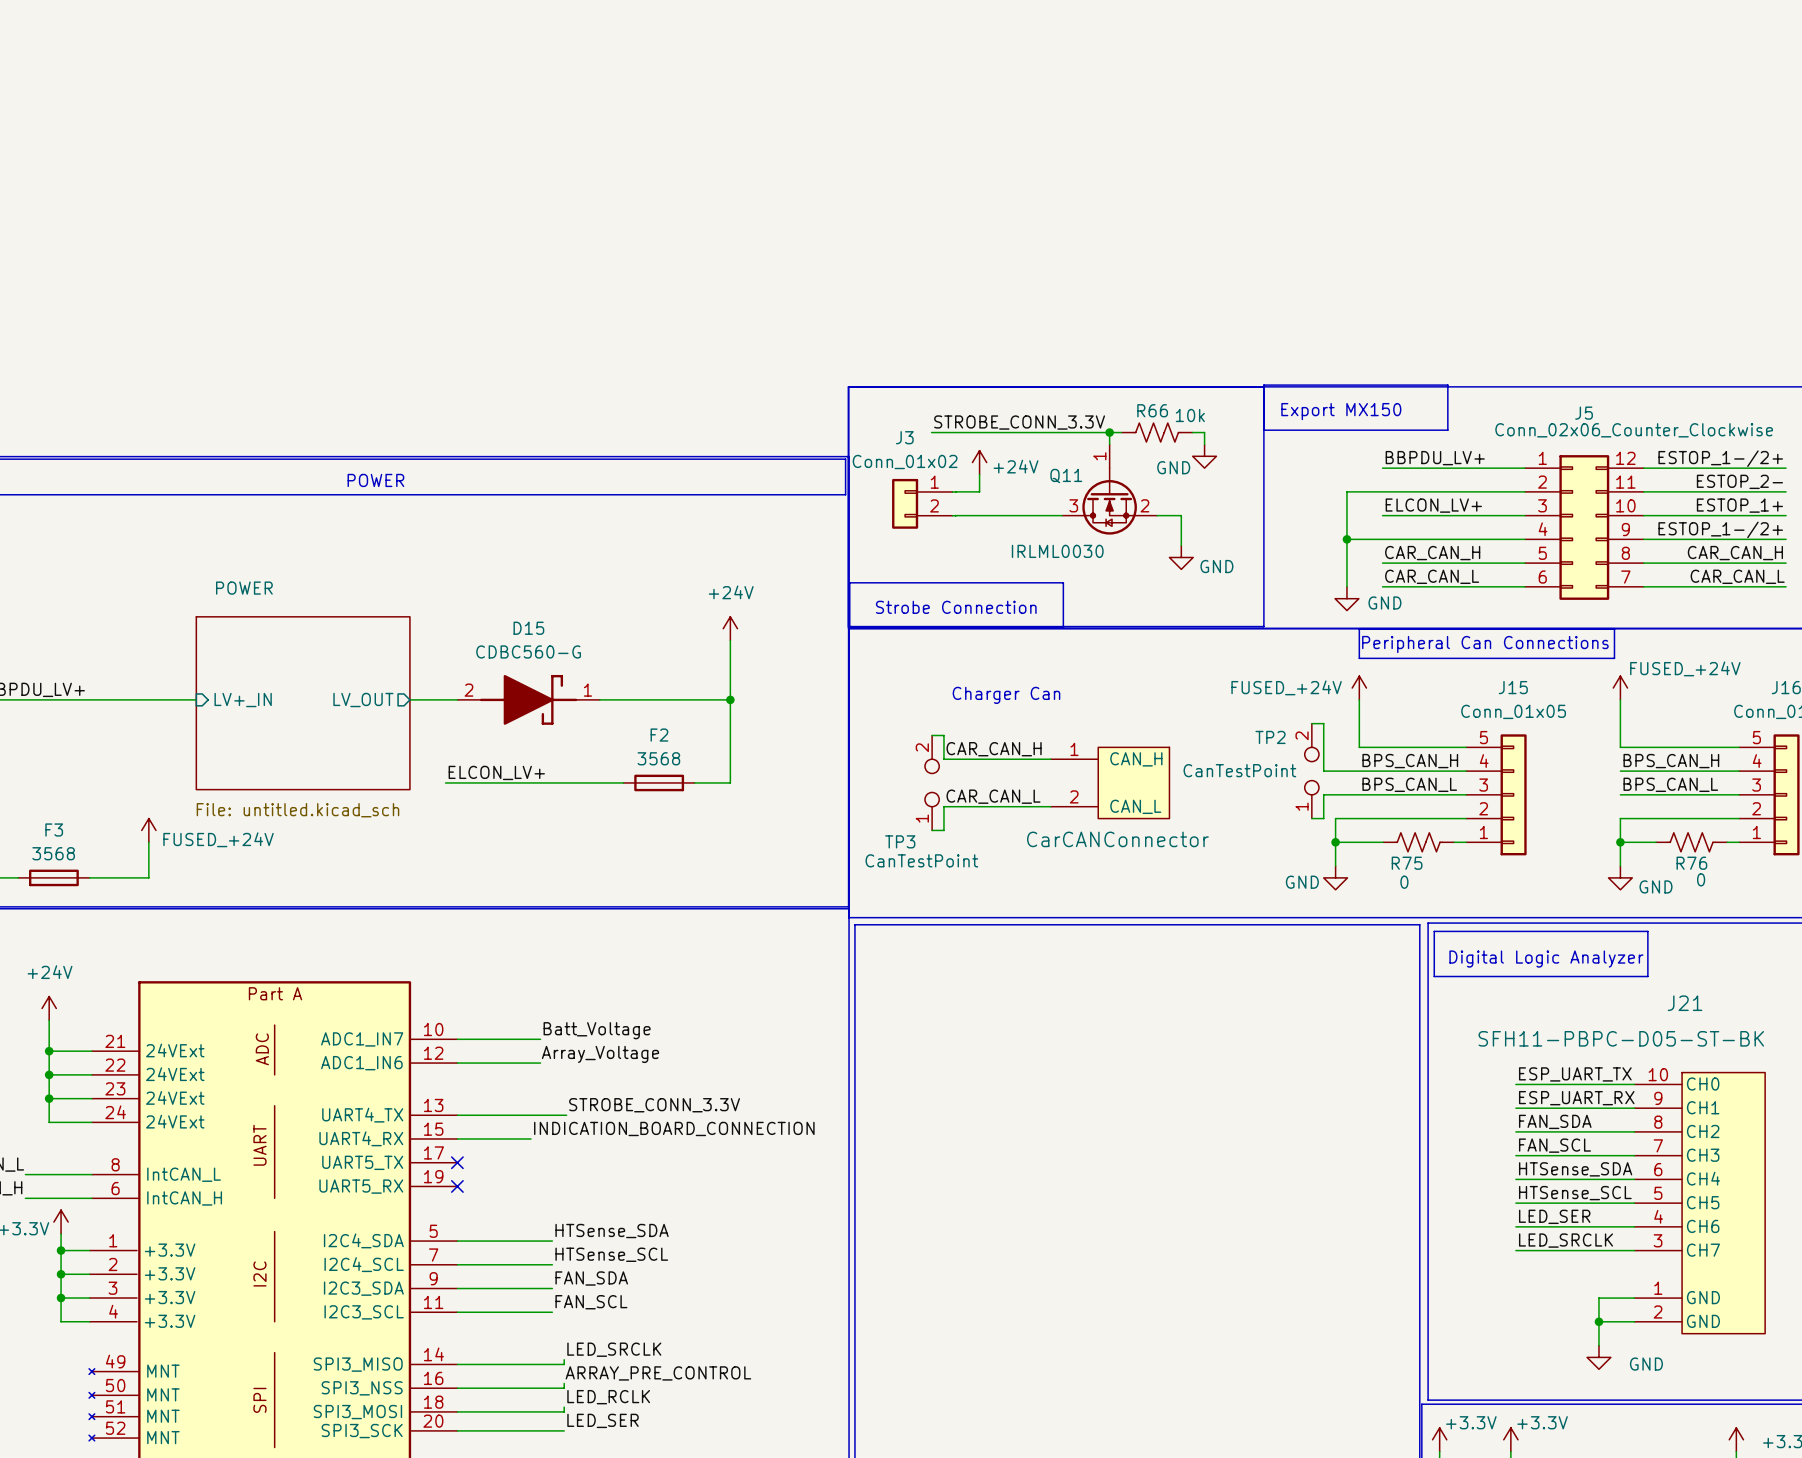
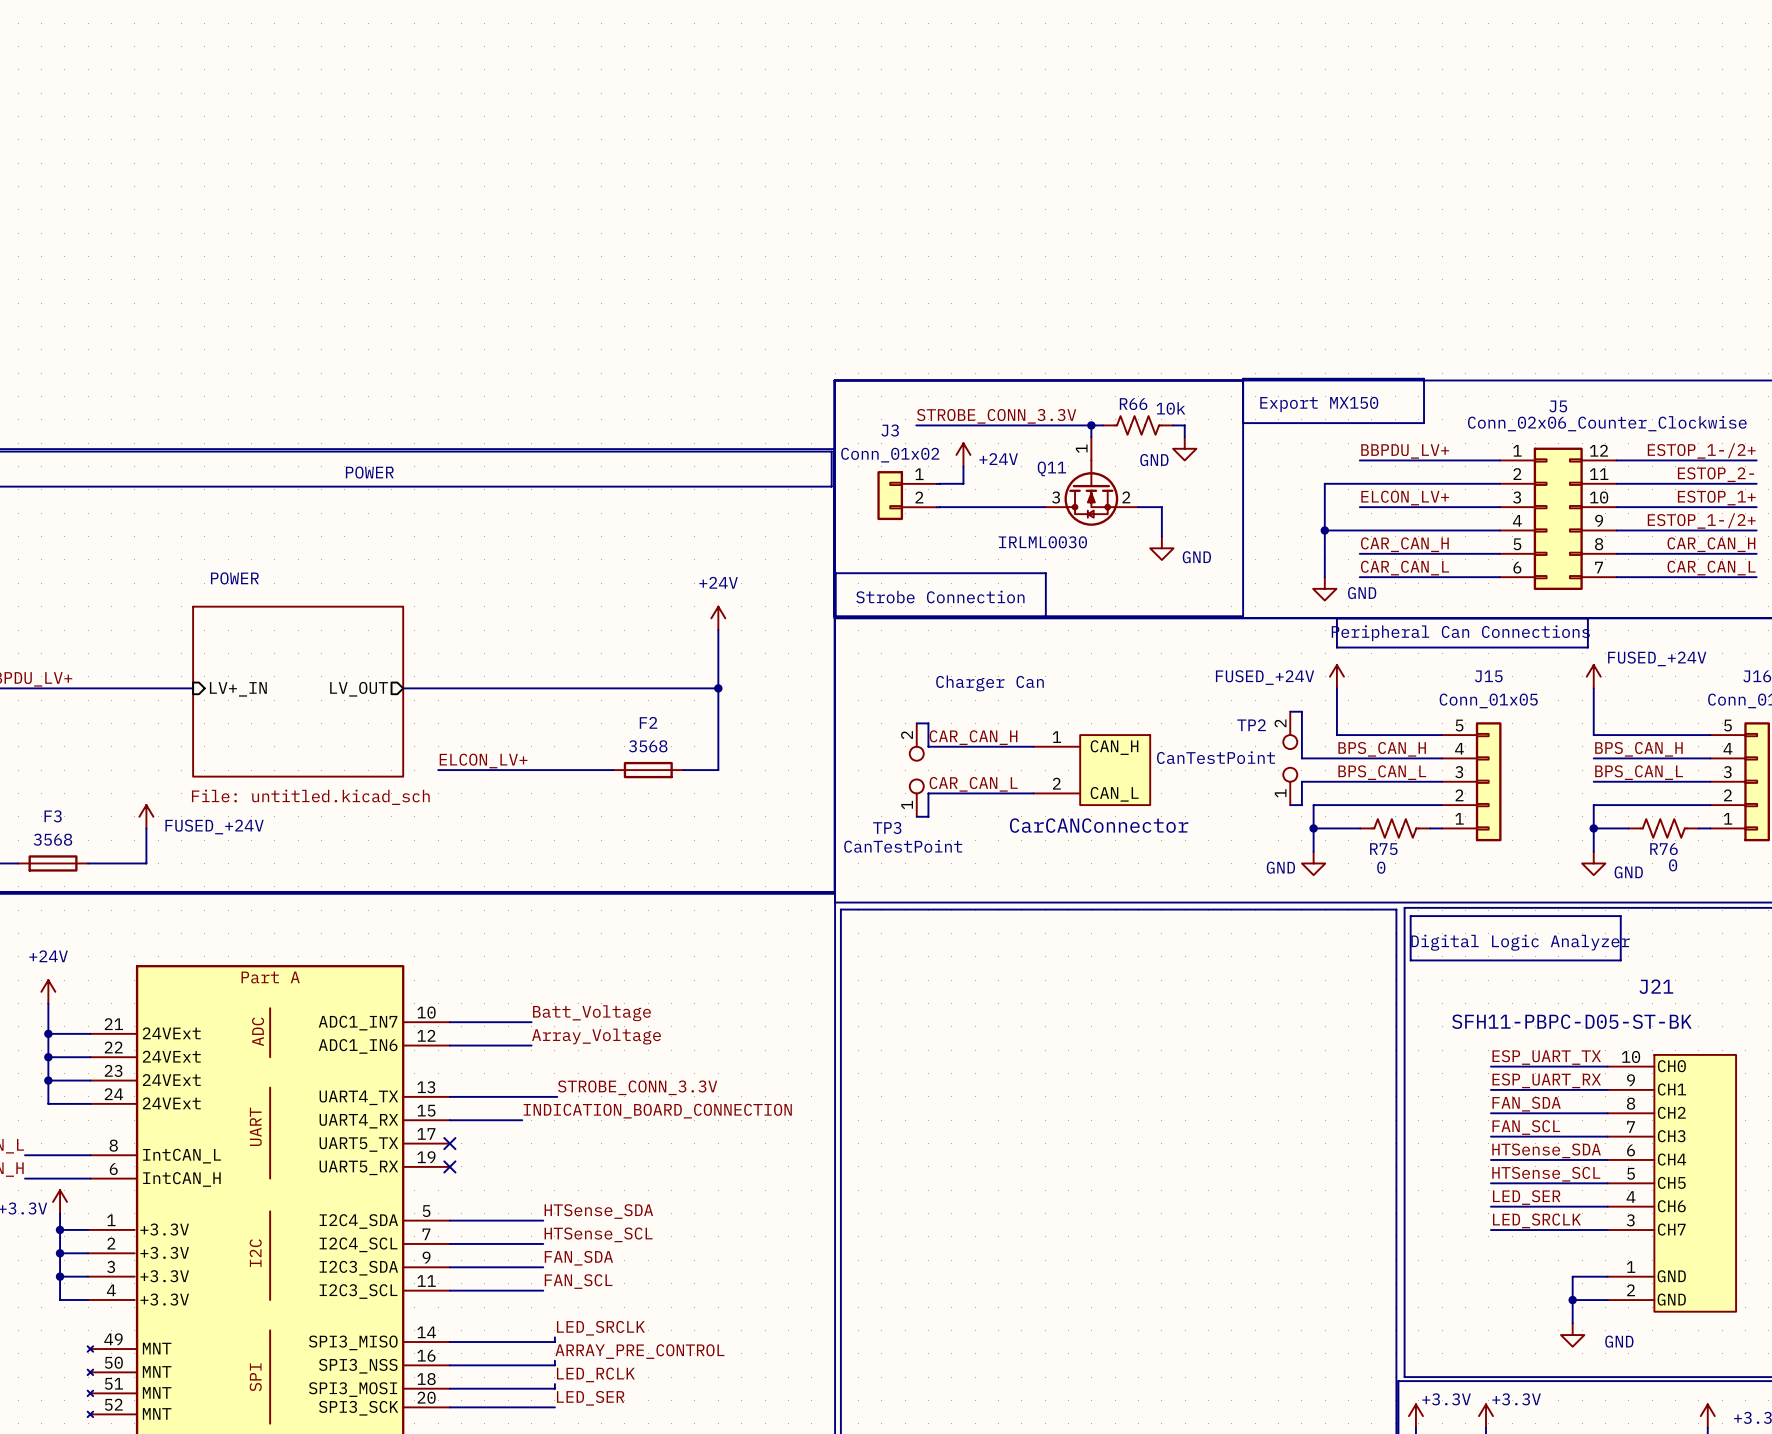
D15: CDBC560-G (528, 699) -> none

